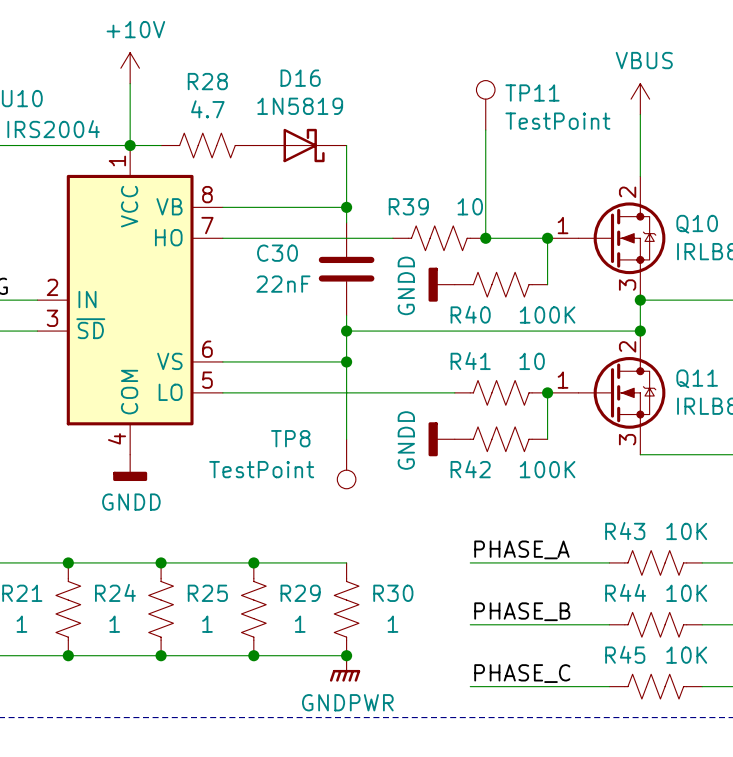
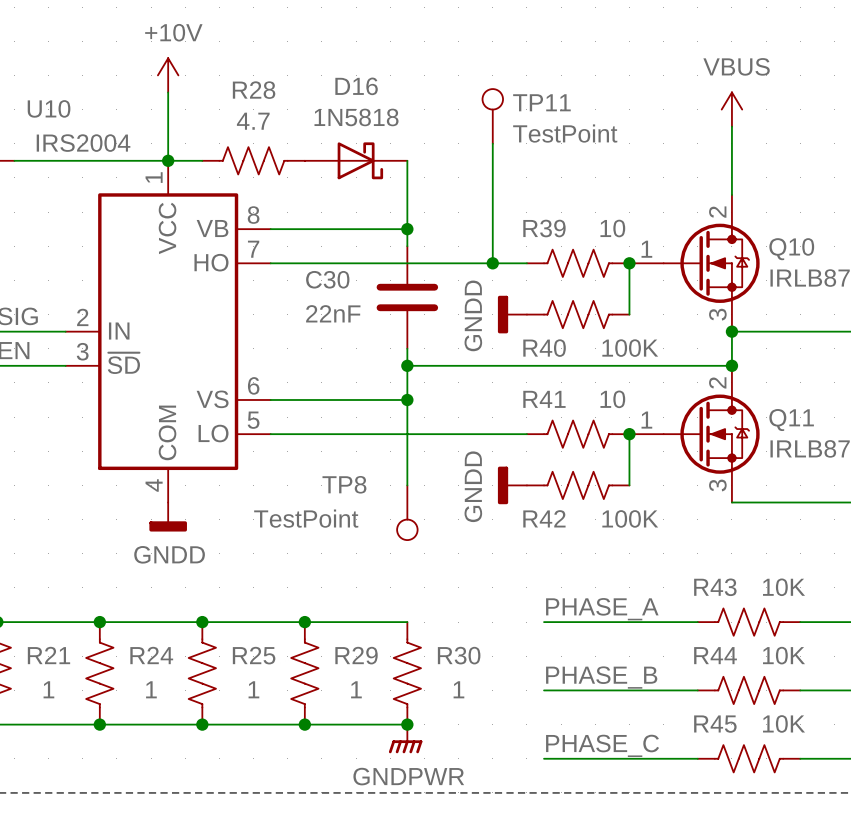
TP11 position: (485, 105) -> (492, 116)
D16 value: 1N5819 (300, 106) -> 1N5818 (356, 117)
wire: none -> (492, 143) (492, 263)
wire: (485, 130) (485, 238) (547, 238) -> none
wire: none -> (458, 263) (526, 263)
R39 position: (439, 238) -> (578, 263)
junction position: (485, 238) -> (492, 263)

